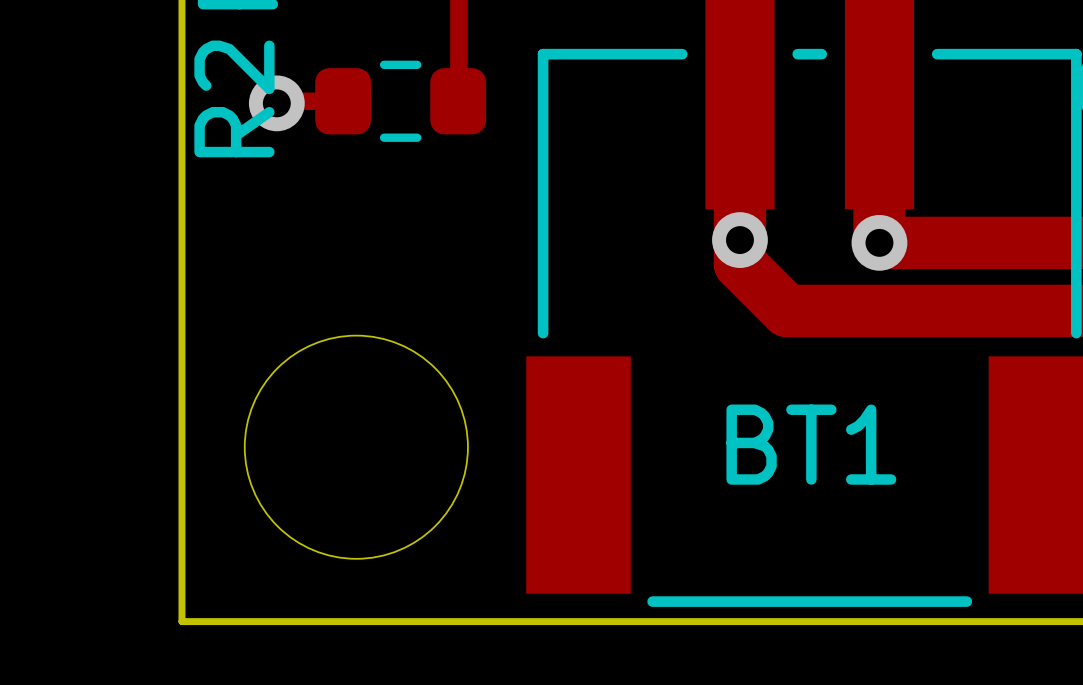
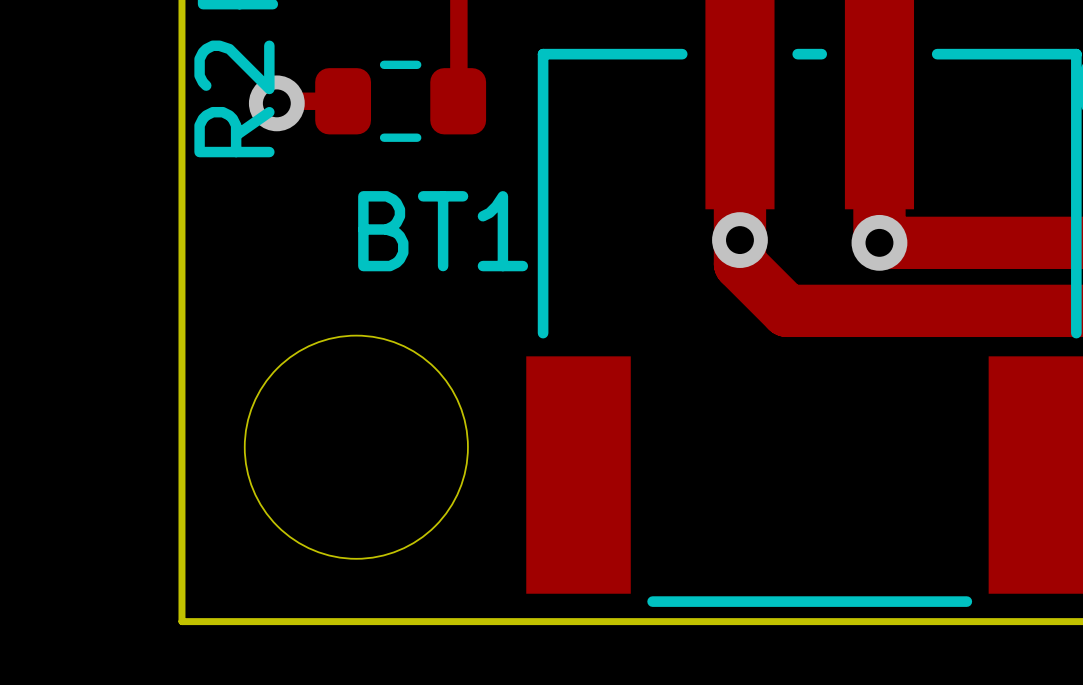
BT1 name position: BT1 (811, 444) -> BT1 (443, 231)

